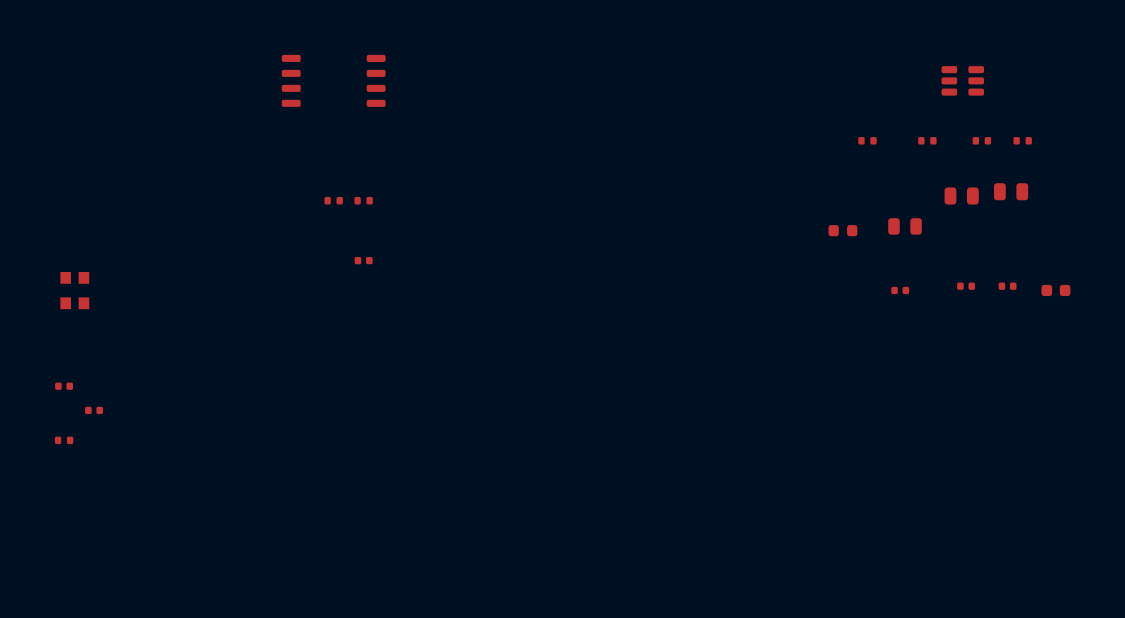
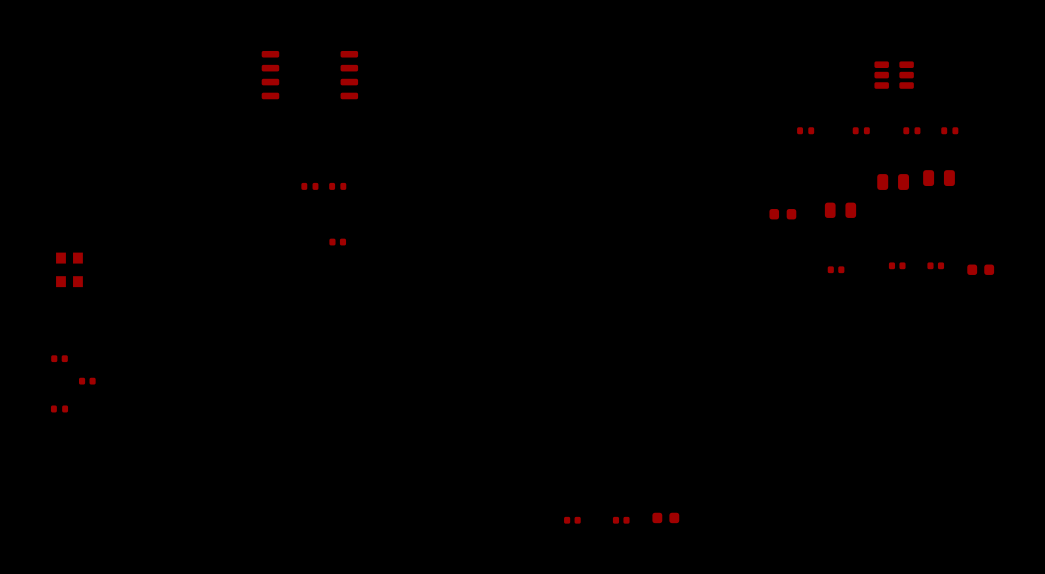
part: none -> (665, 517)
part: none -> (572, 520)
part: none -> (621, 520)

